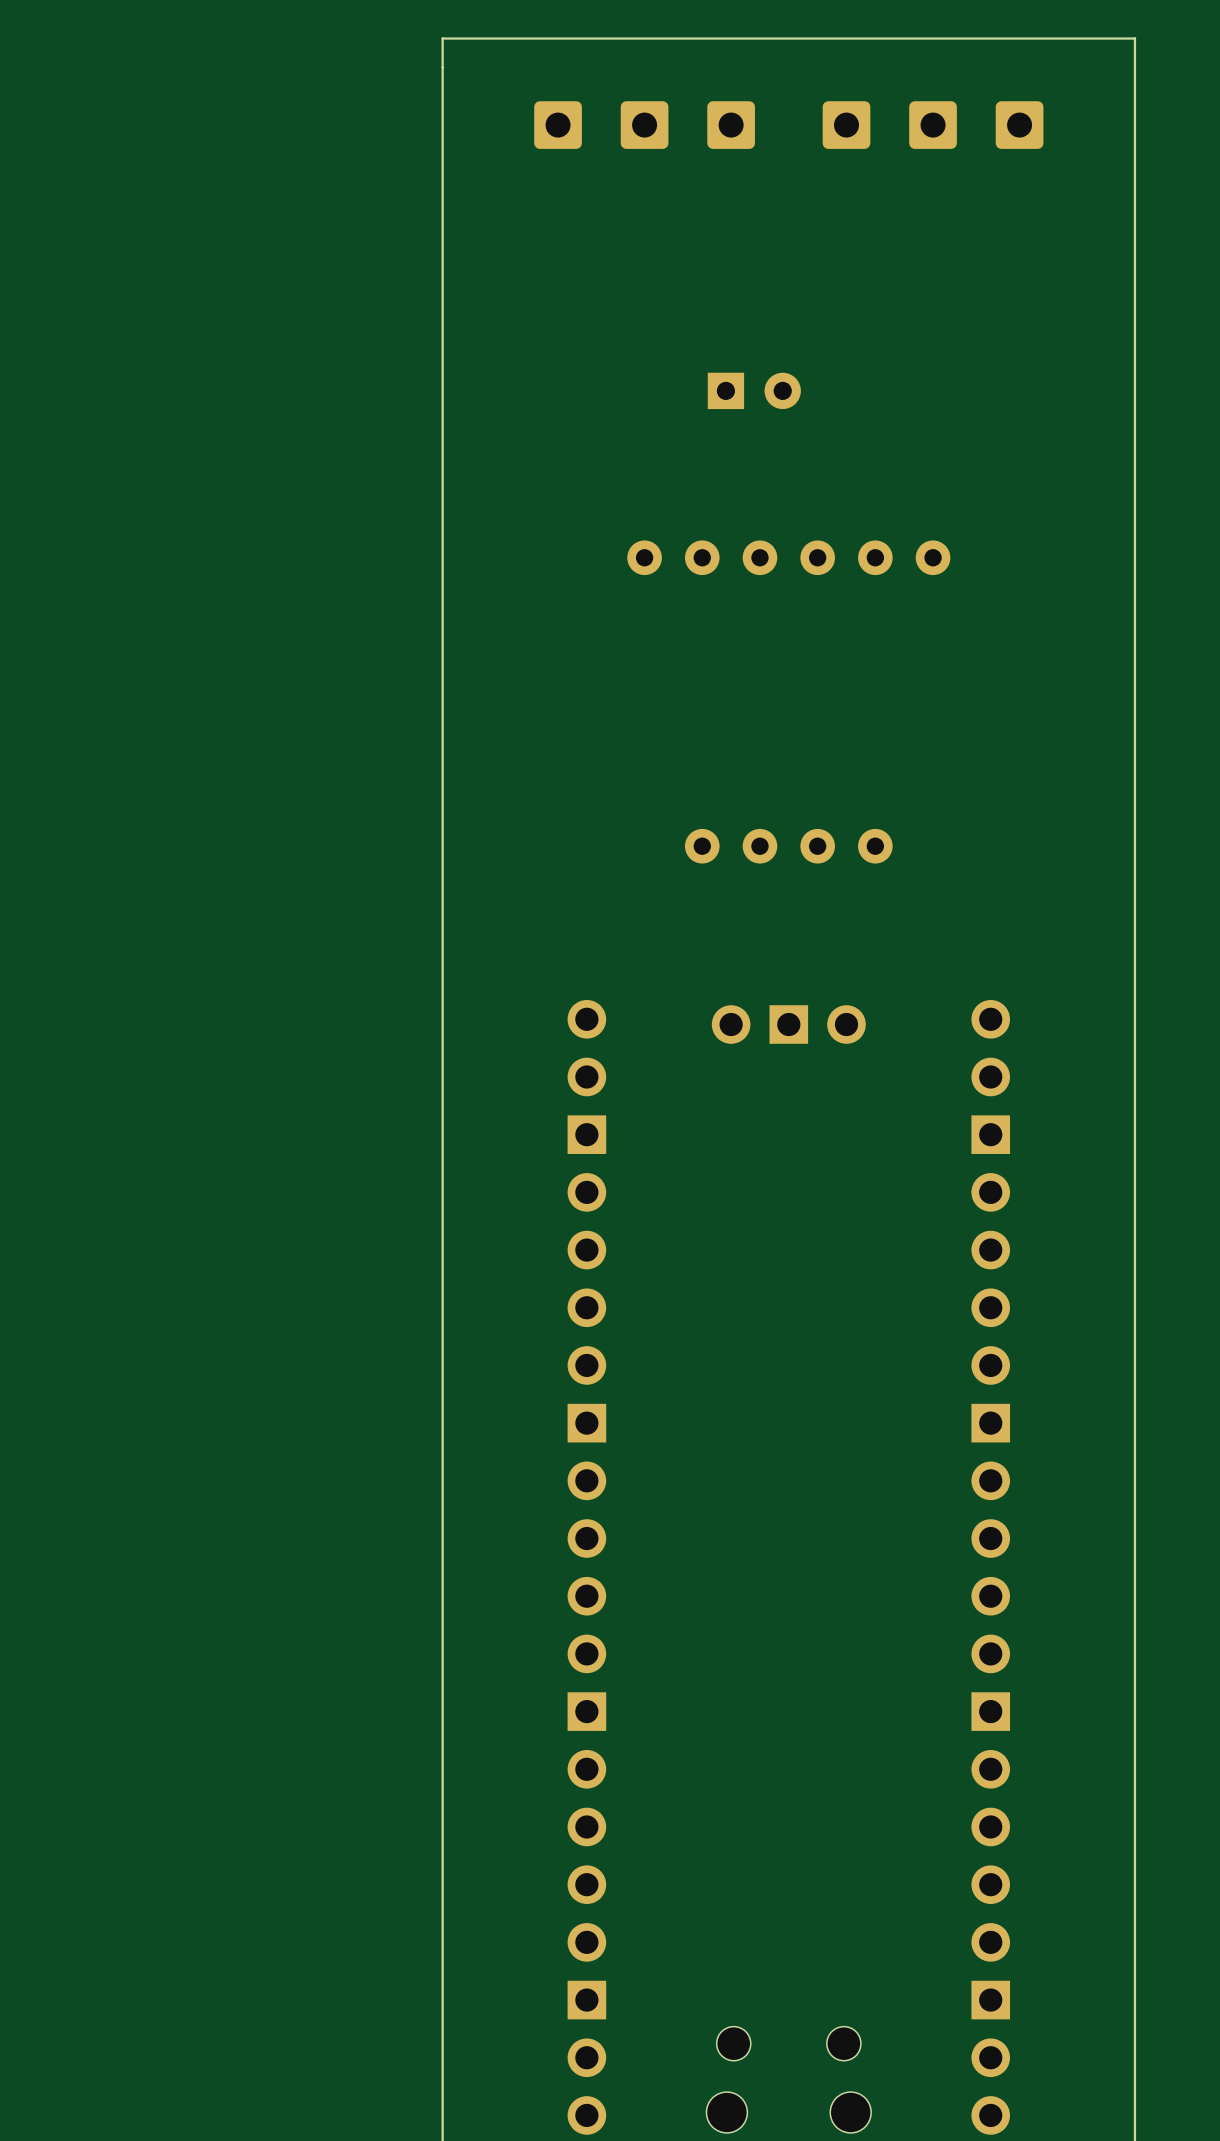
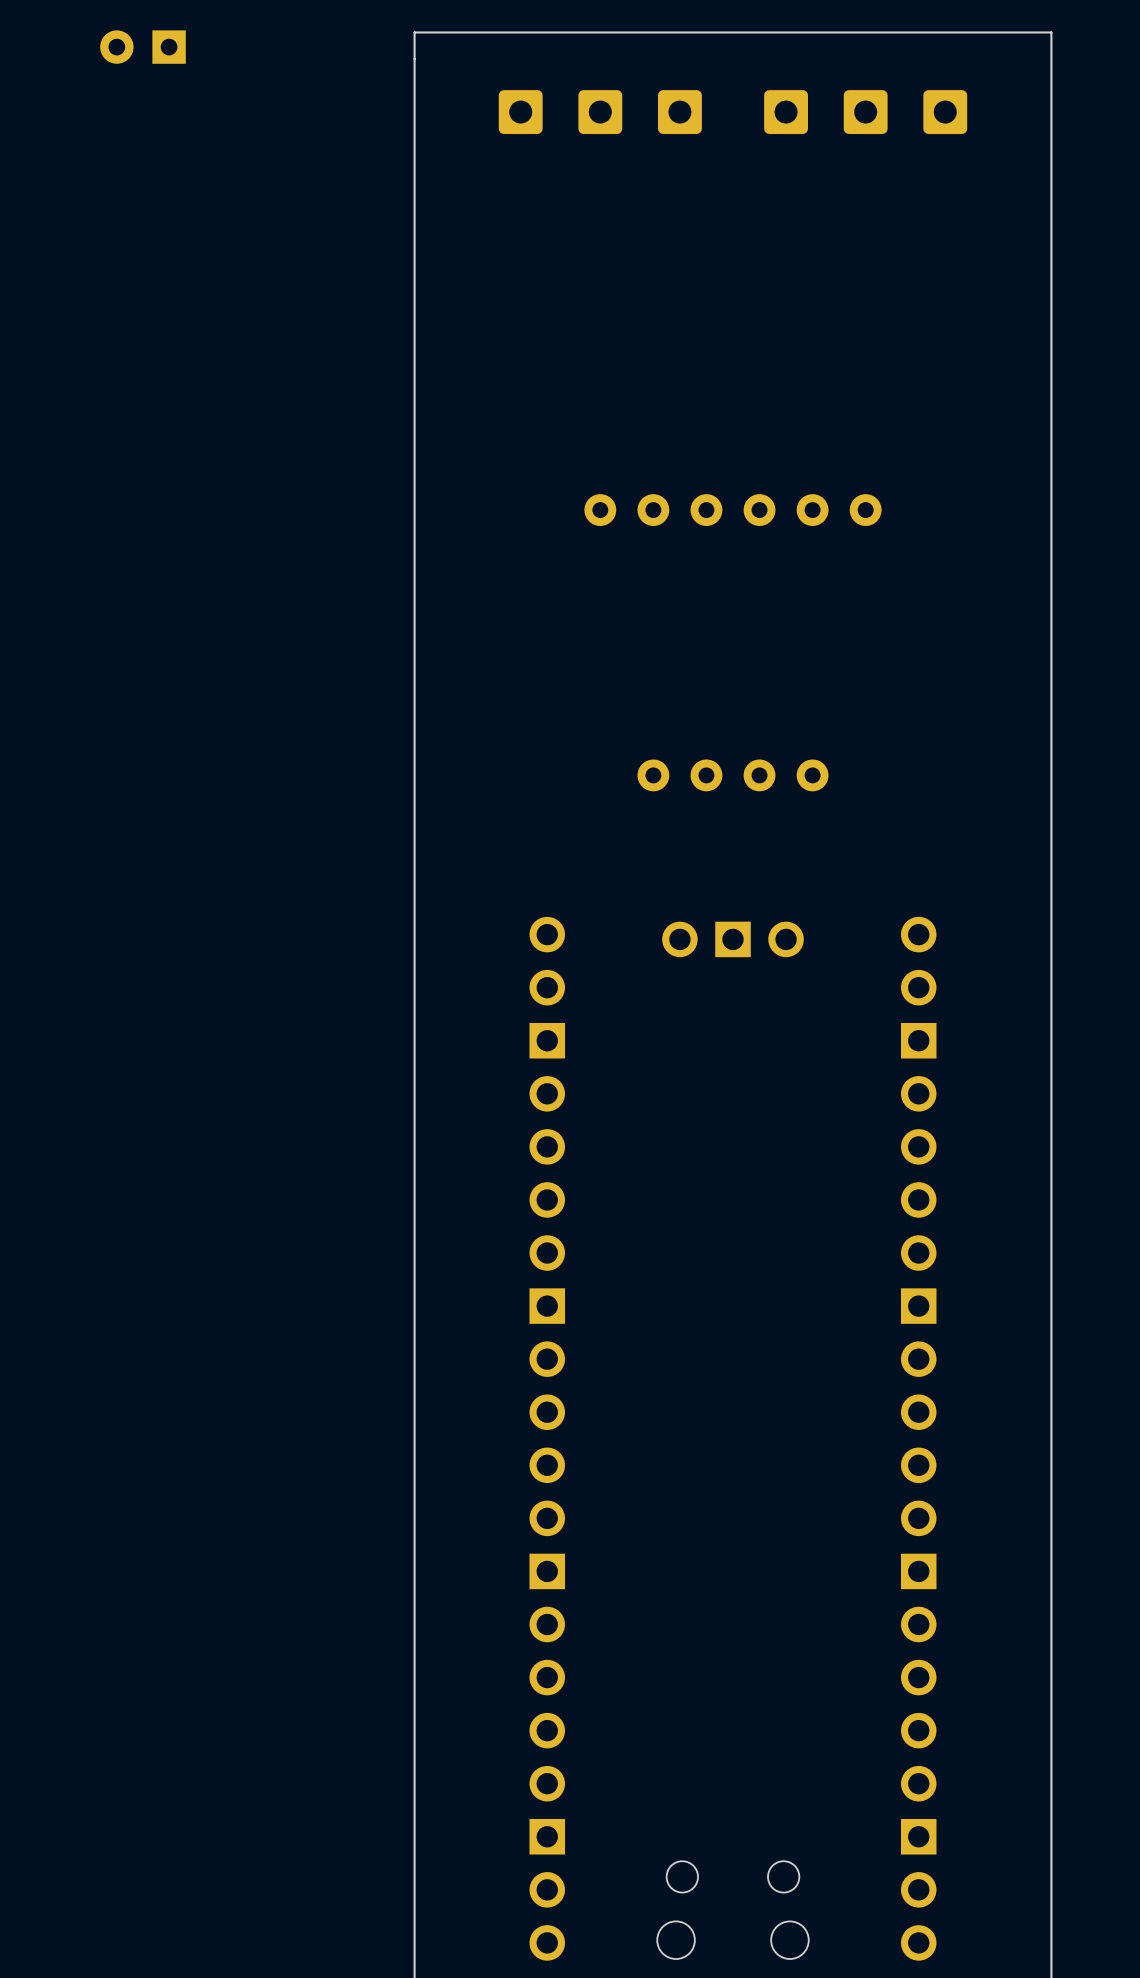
part: none -> (142, 47)
part: (754, 390) -> none

